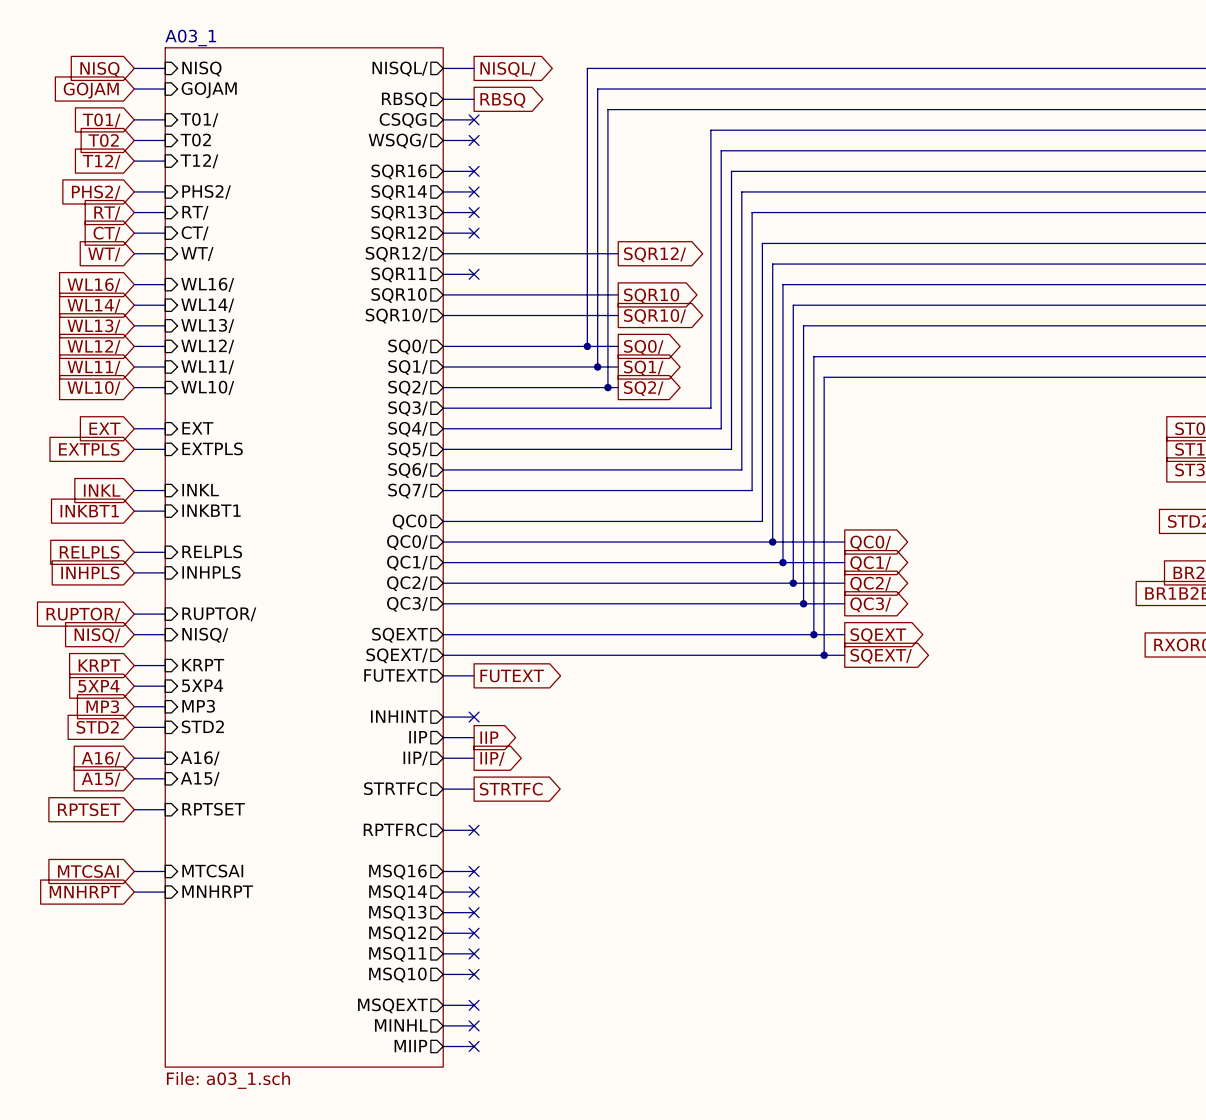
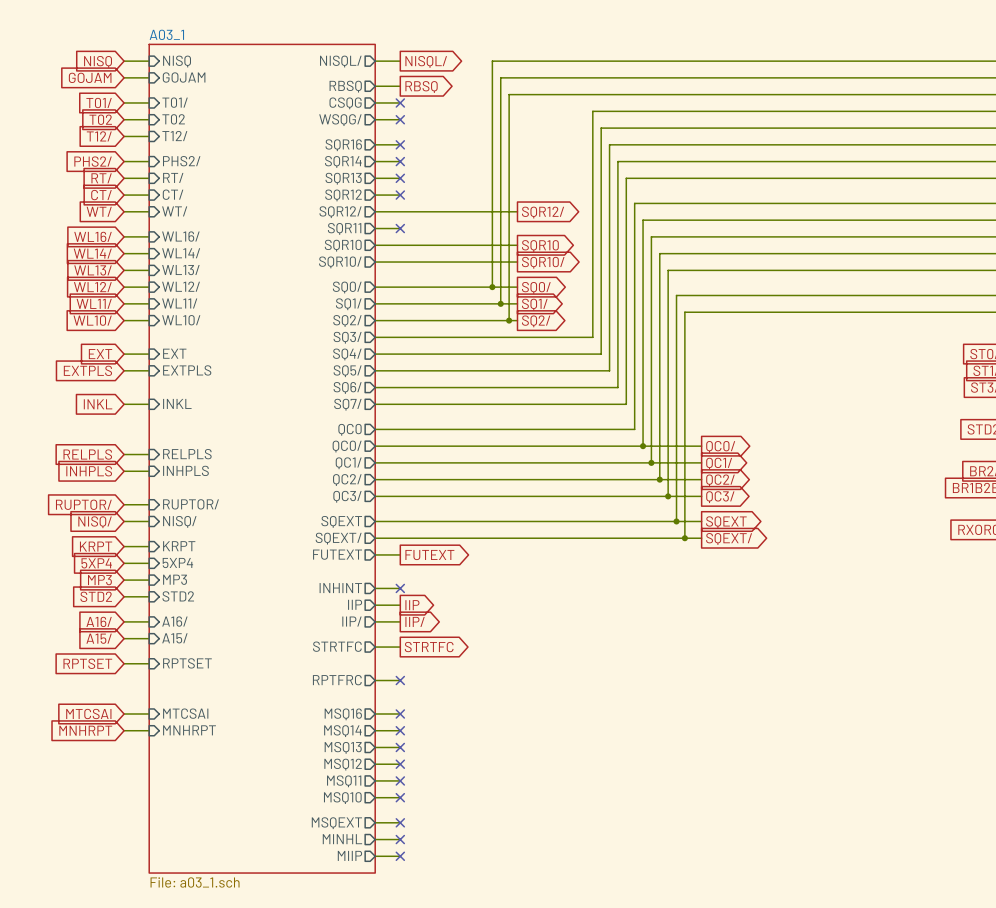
sheet pin: INKBT1 (211, 510) -> none
global label: INKBT1 (89, 511) -> none
wire: (134, 511) (165, 511) -> none

